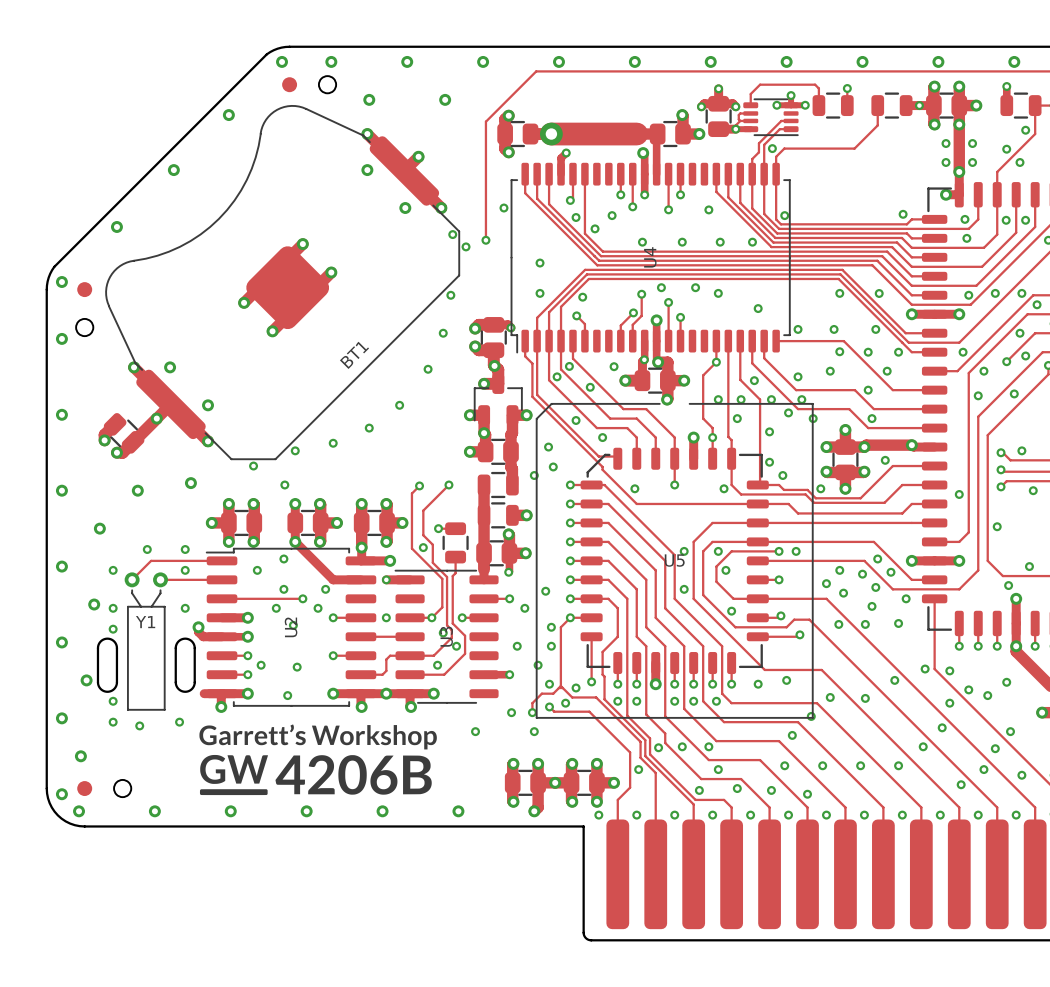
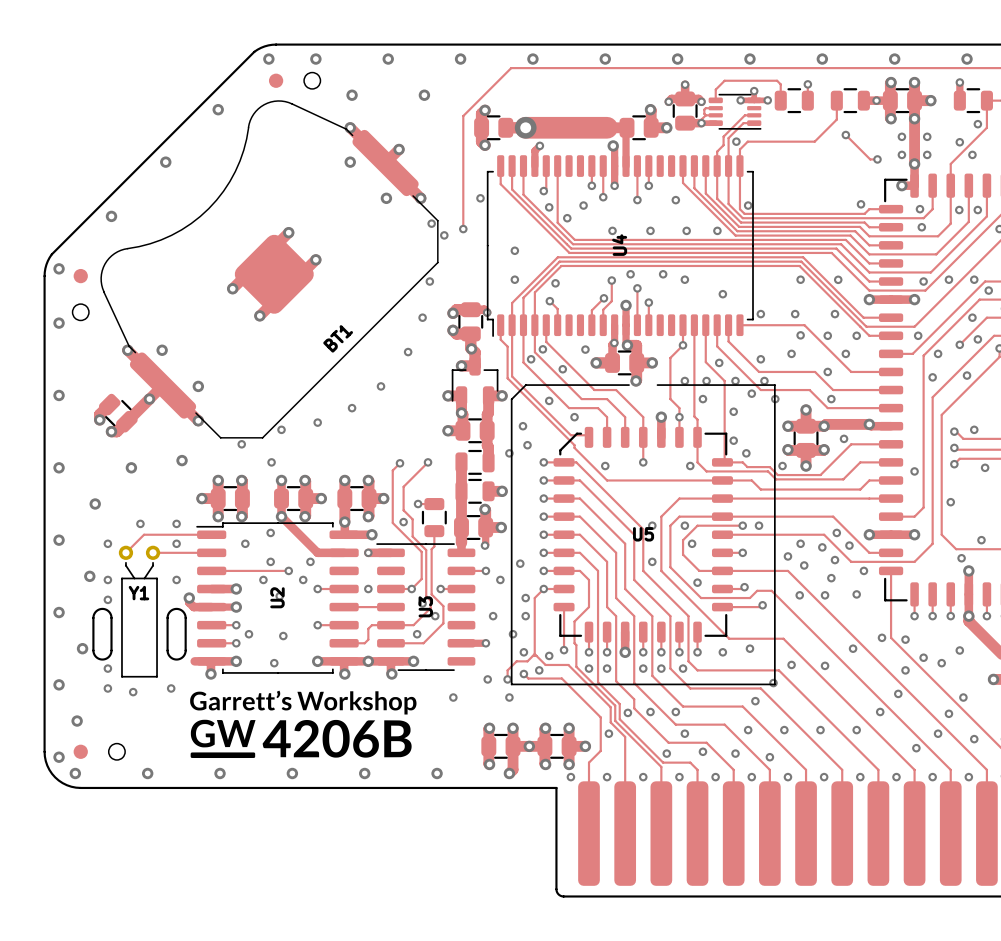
track: none -> (845, 135) (870, 159) (877, 159)
via: none -> (845, 135)
via: none -> (877, 159)

